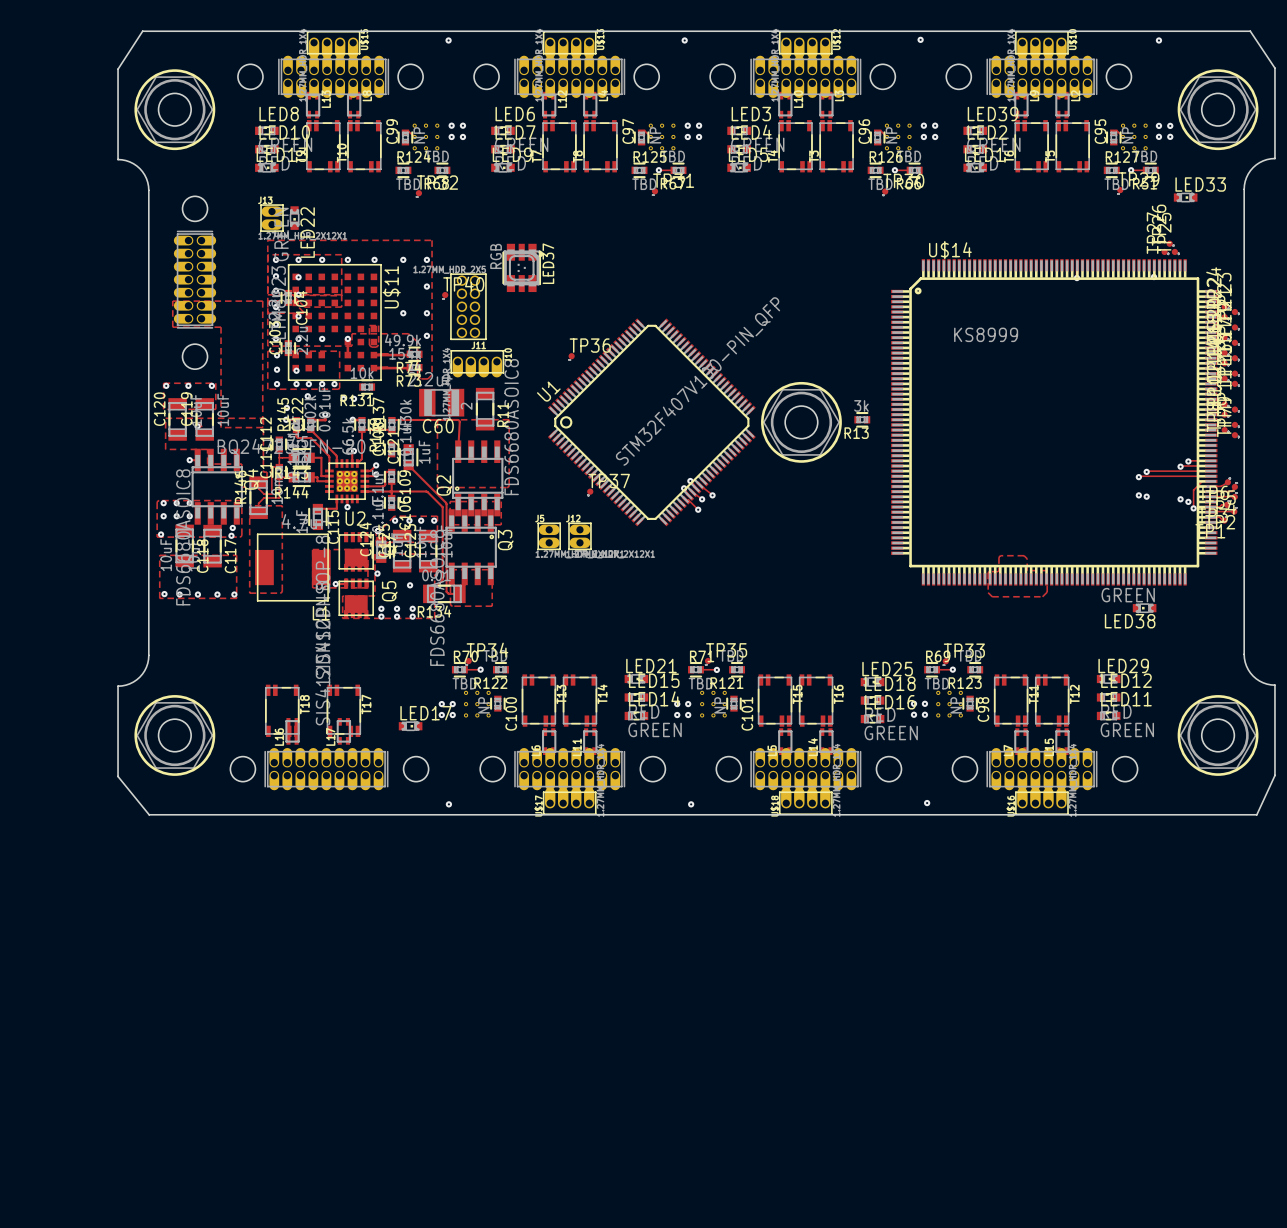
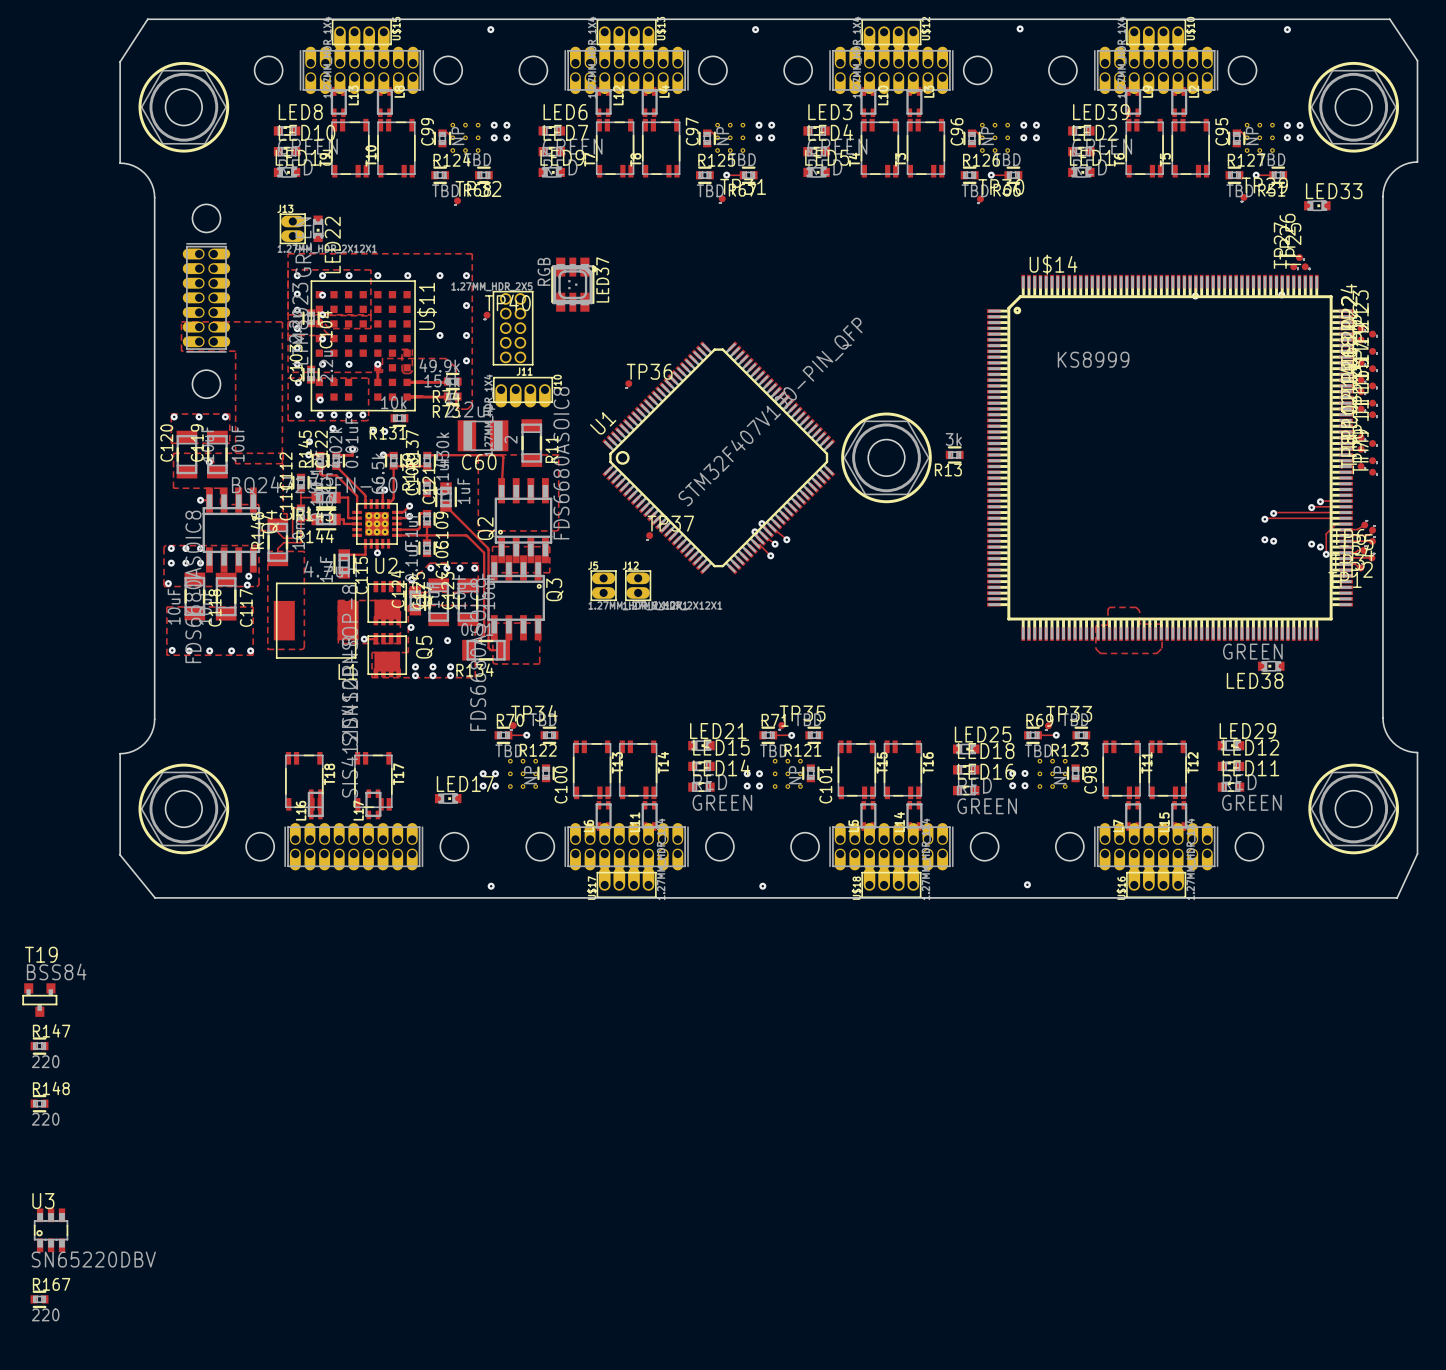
T19: none -> BSS84 (39, 1000)
R147: none -> 220 (39, 1046)
R148: none -> 220 (39, 1103)
U3: none -> SN65220DBV (51, 1230)
R167: none -> 220 (39, 1299)

